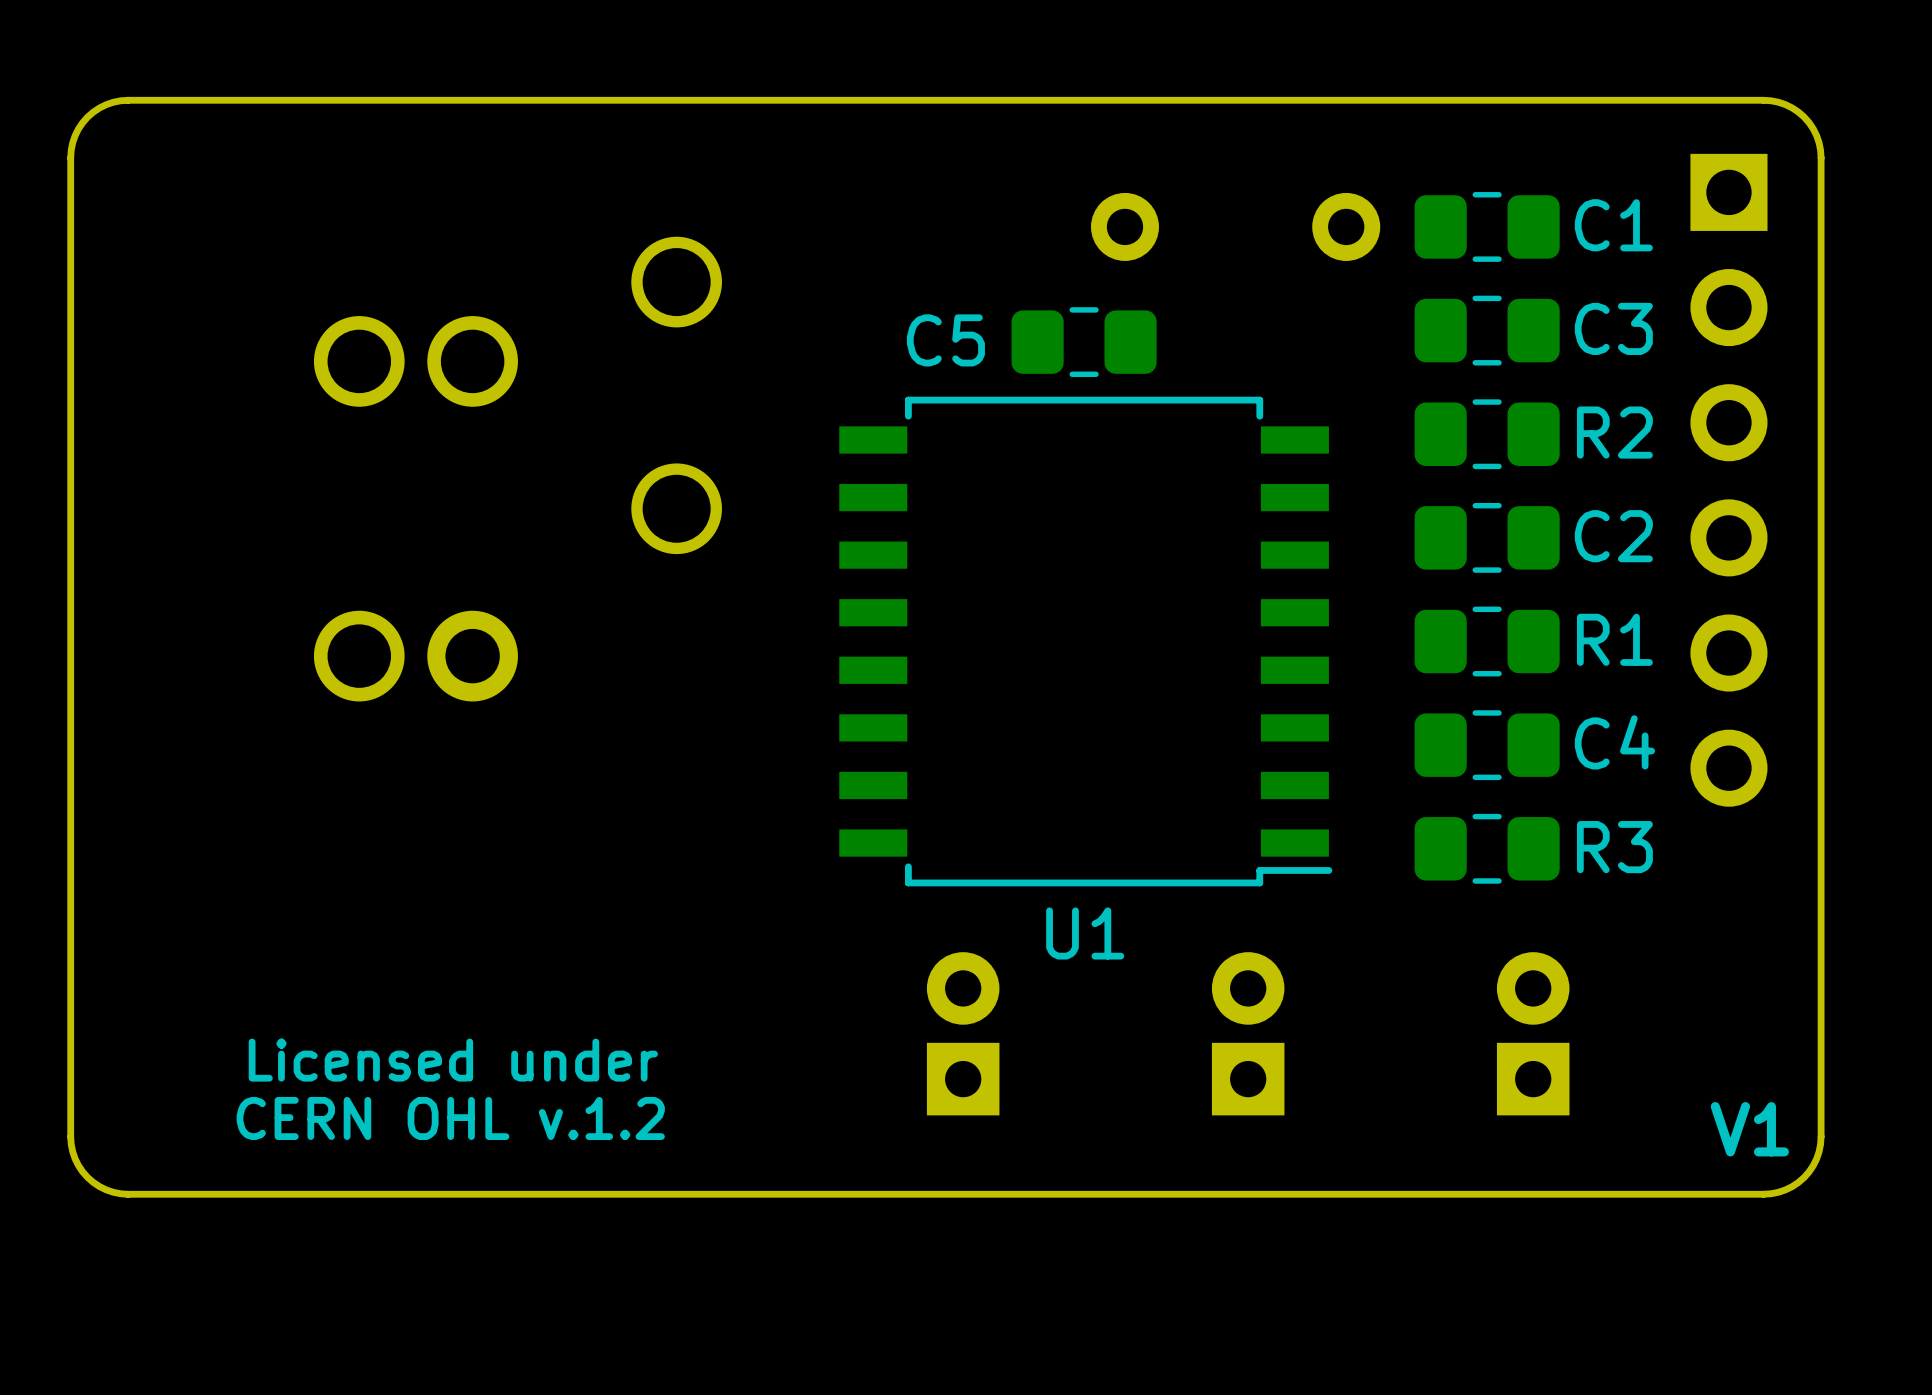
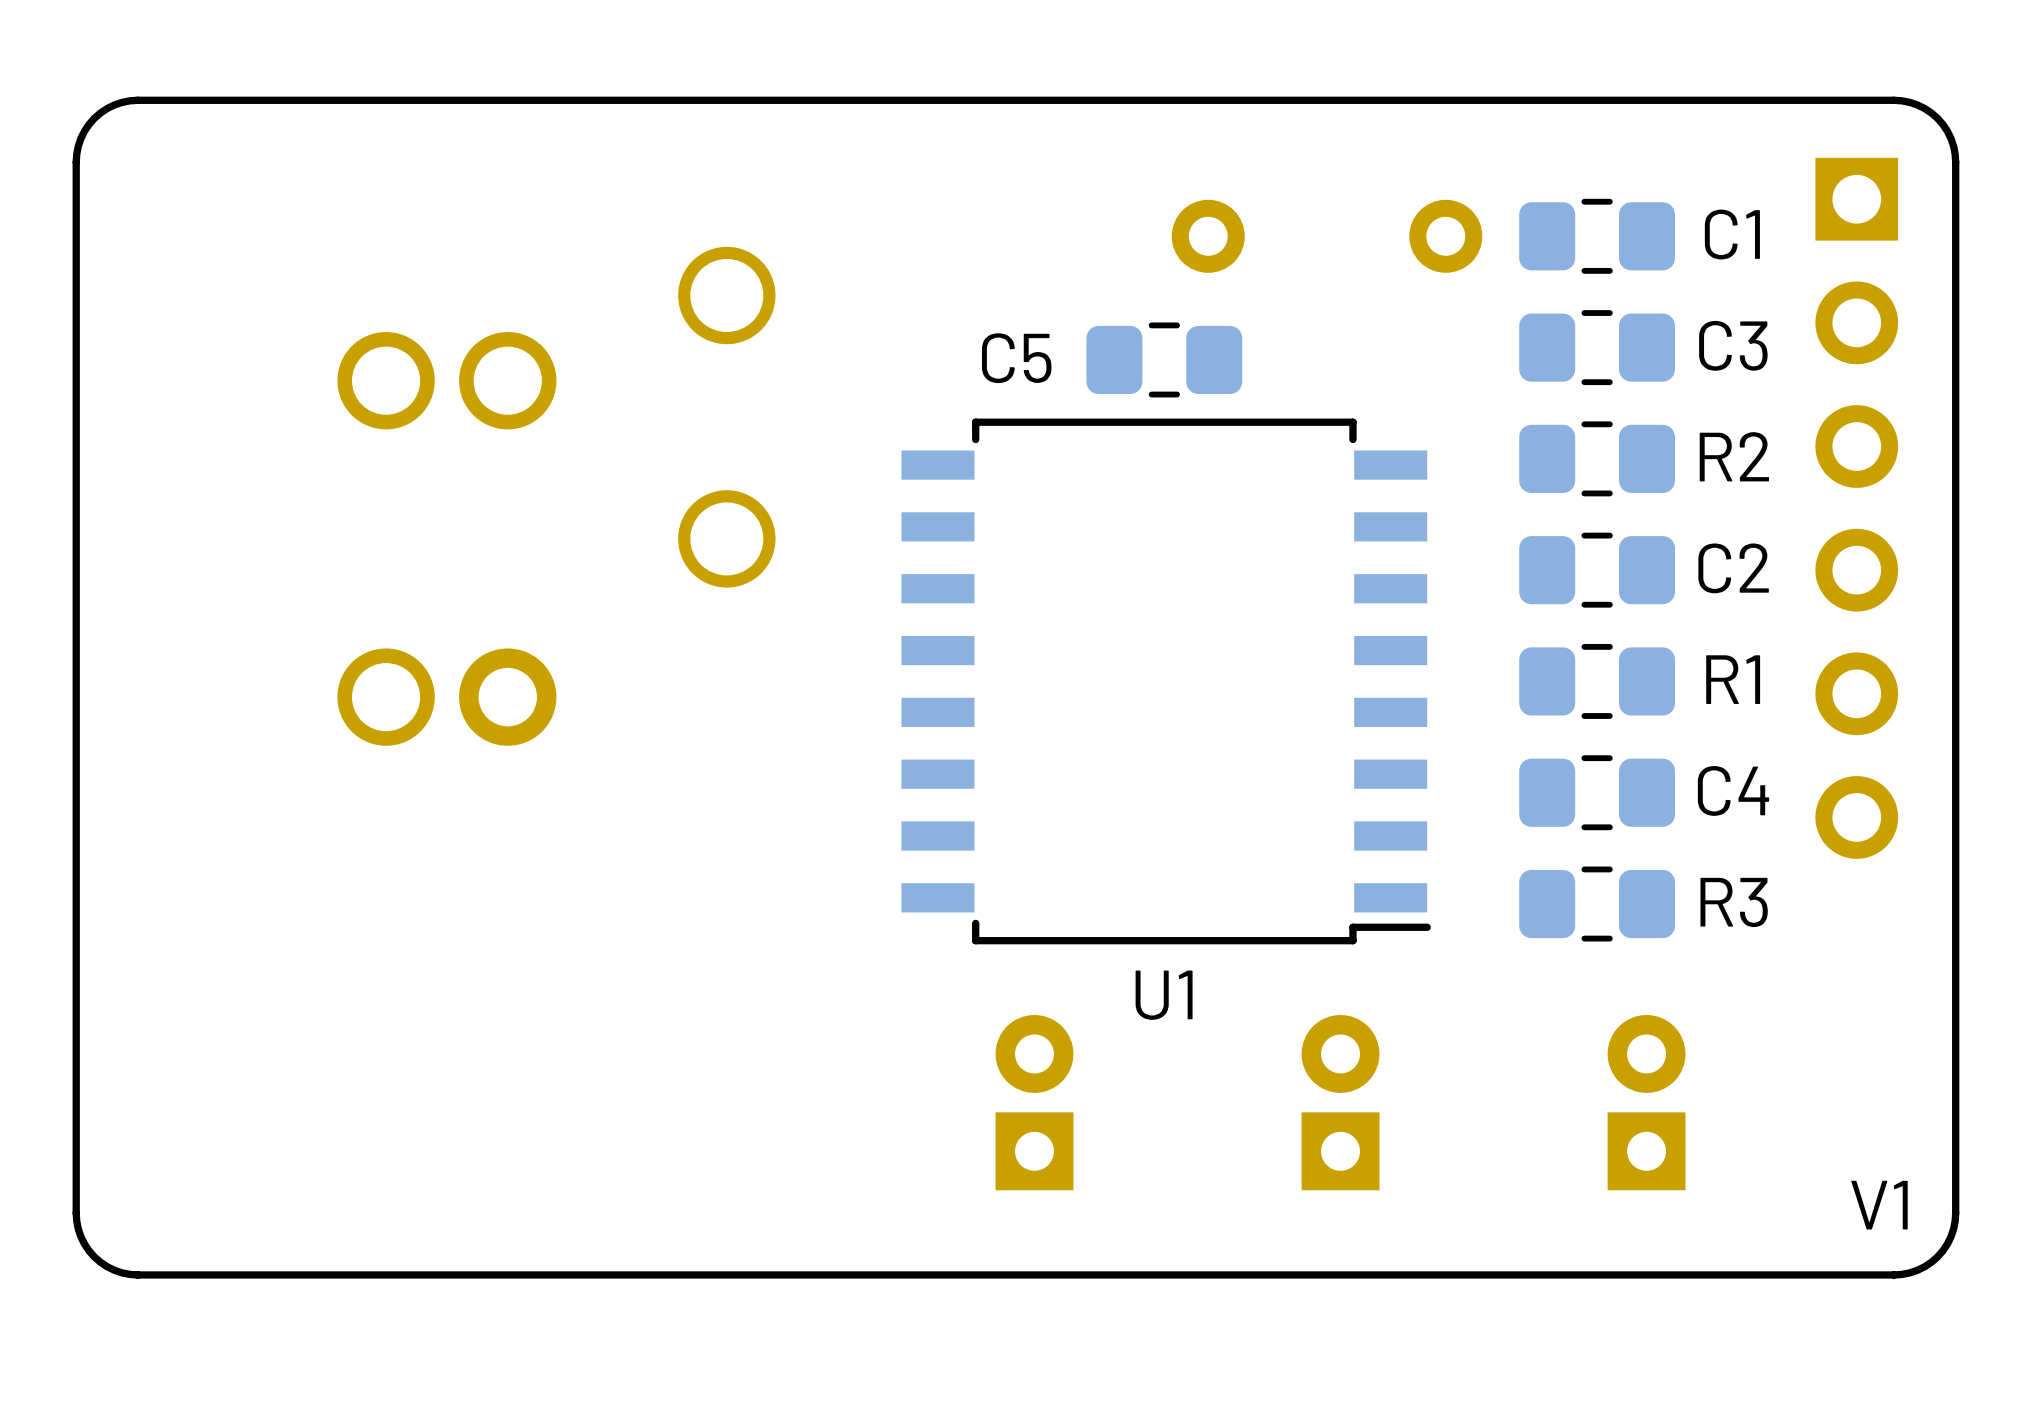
text: Licensed under (453, 1060) -> none
text: CERN OHL v.1.2 (450, 1118) -> none

